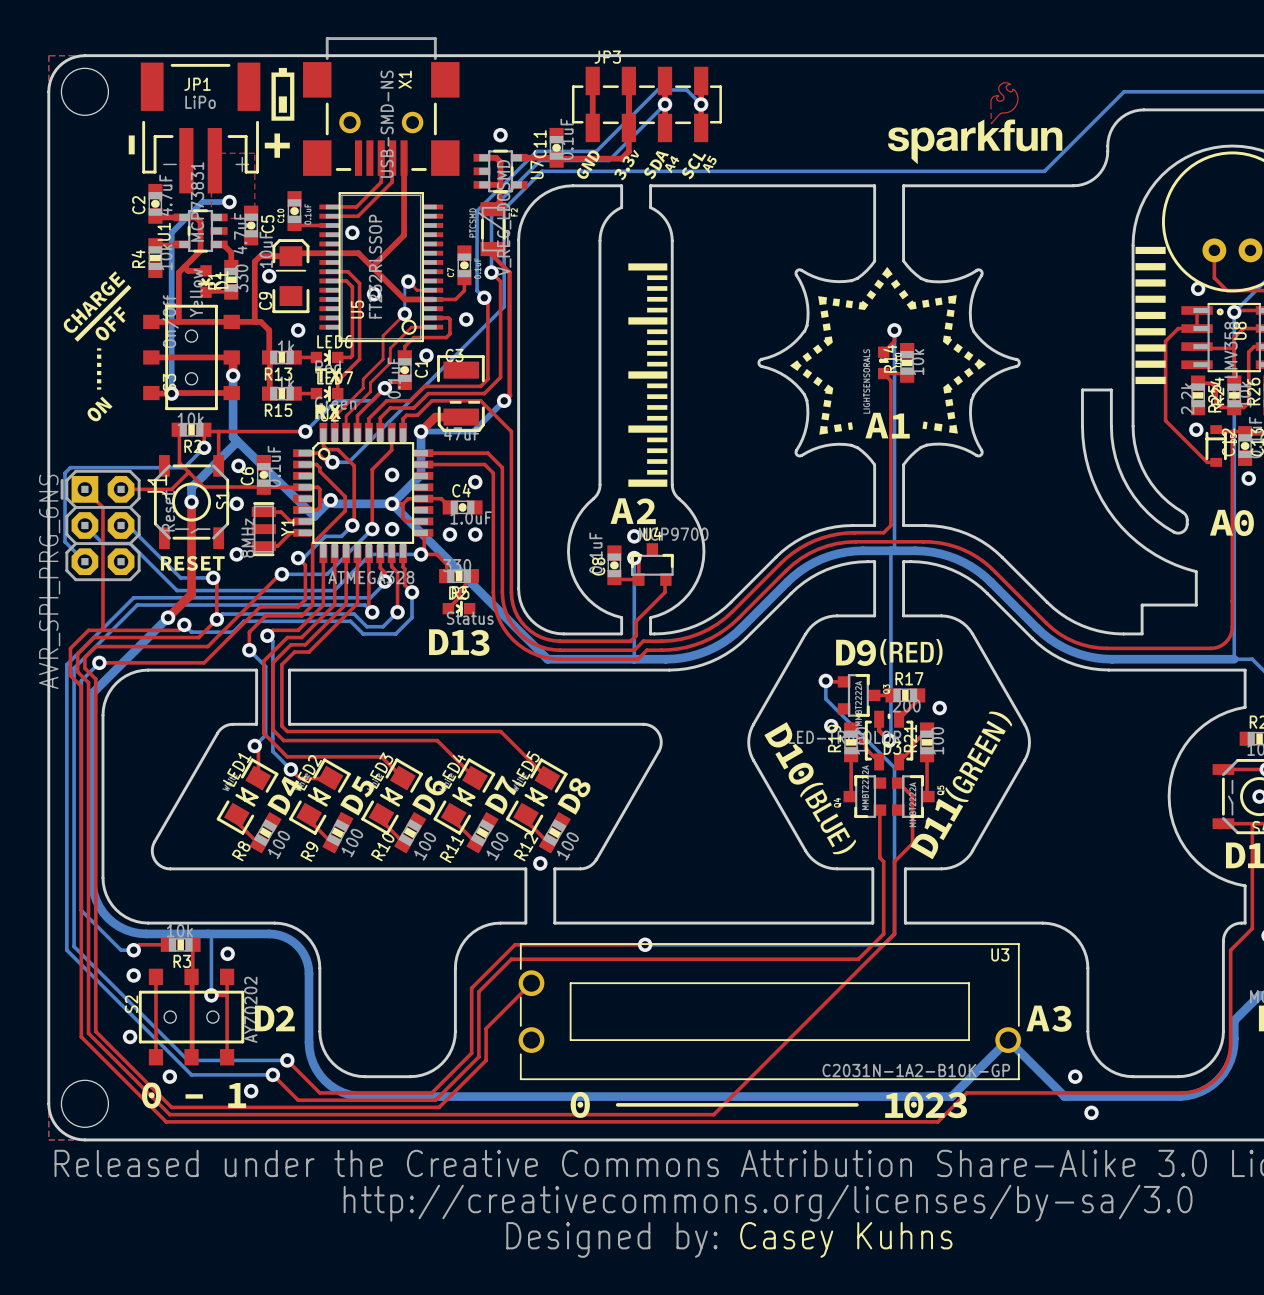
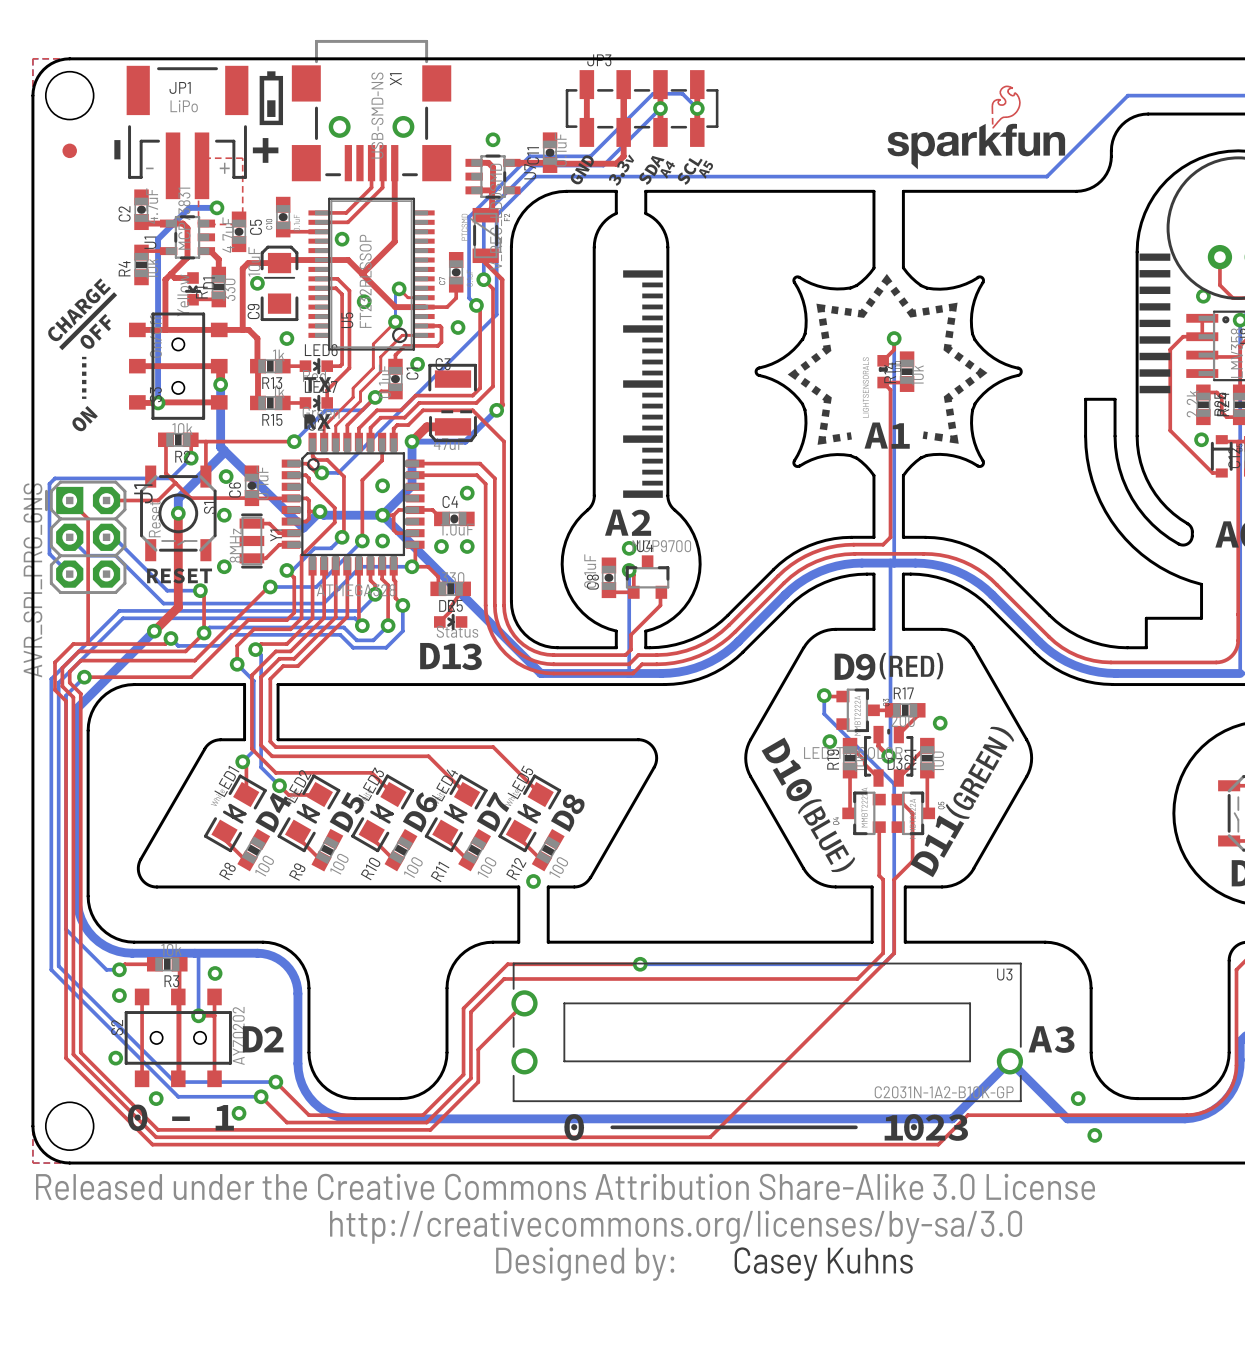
part: none -> (69, 150)

